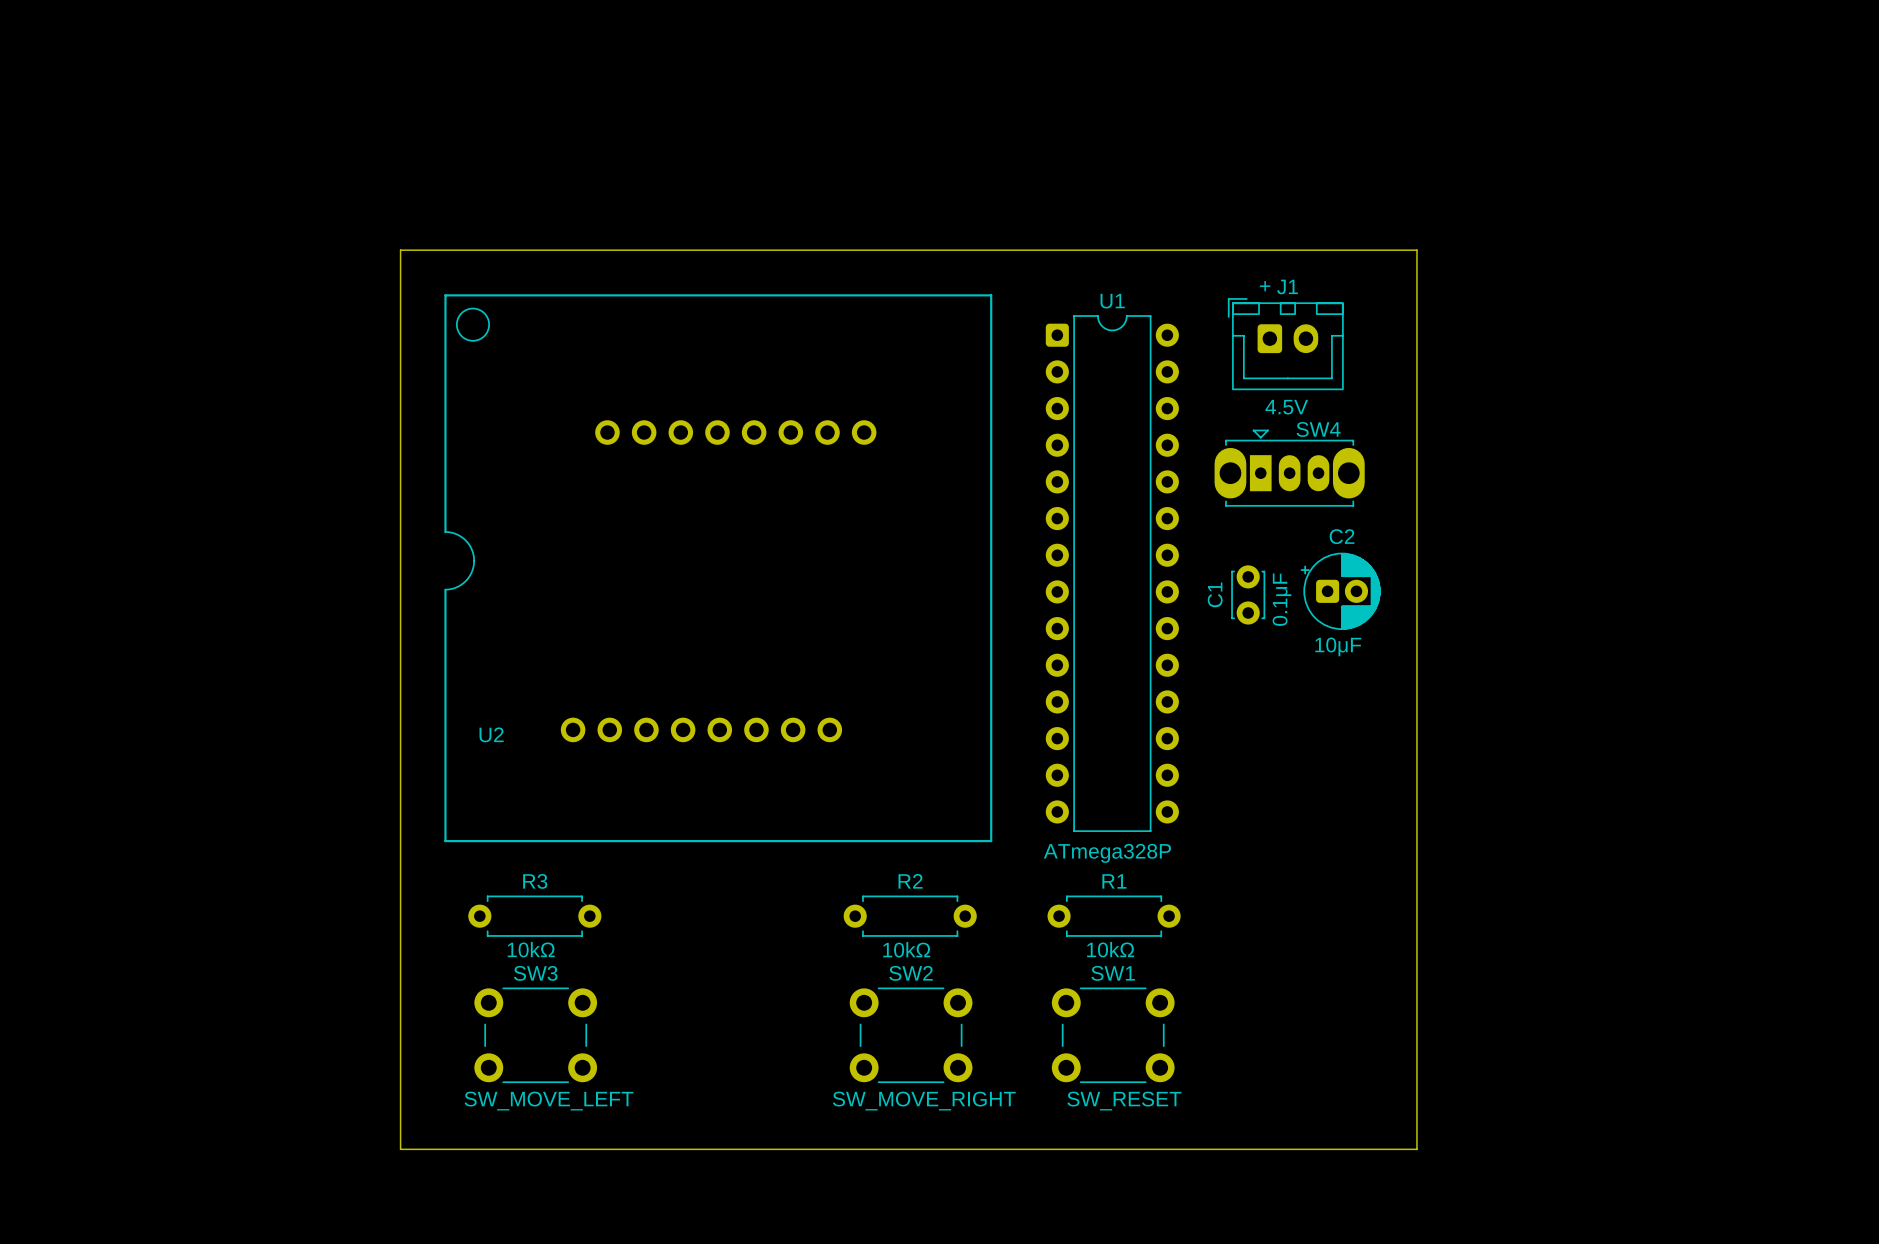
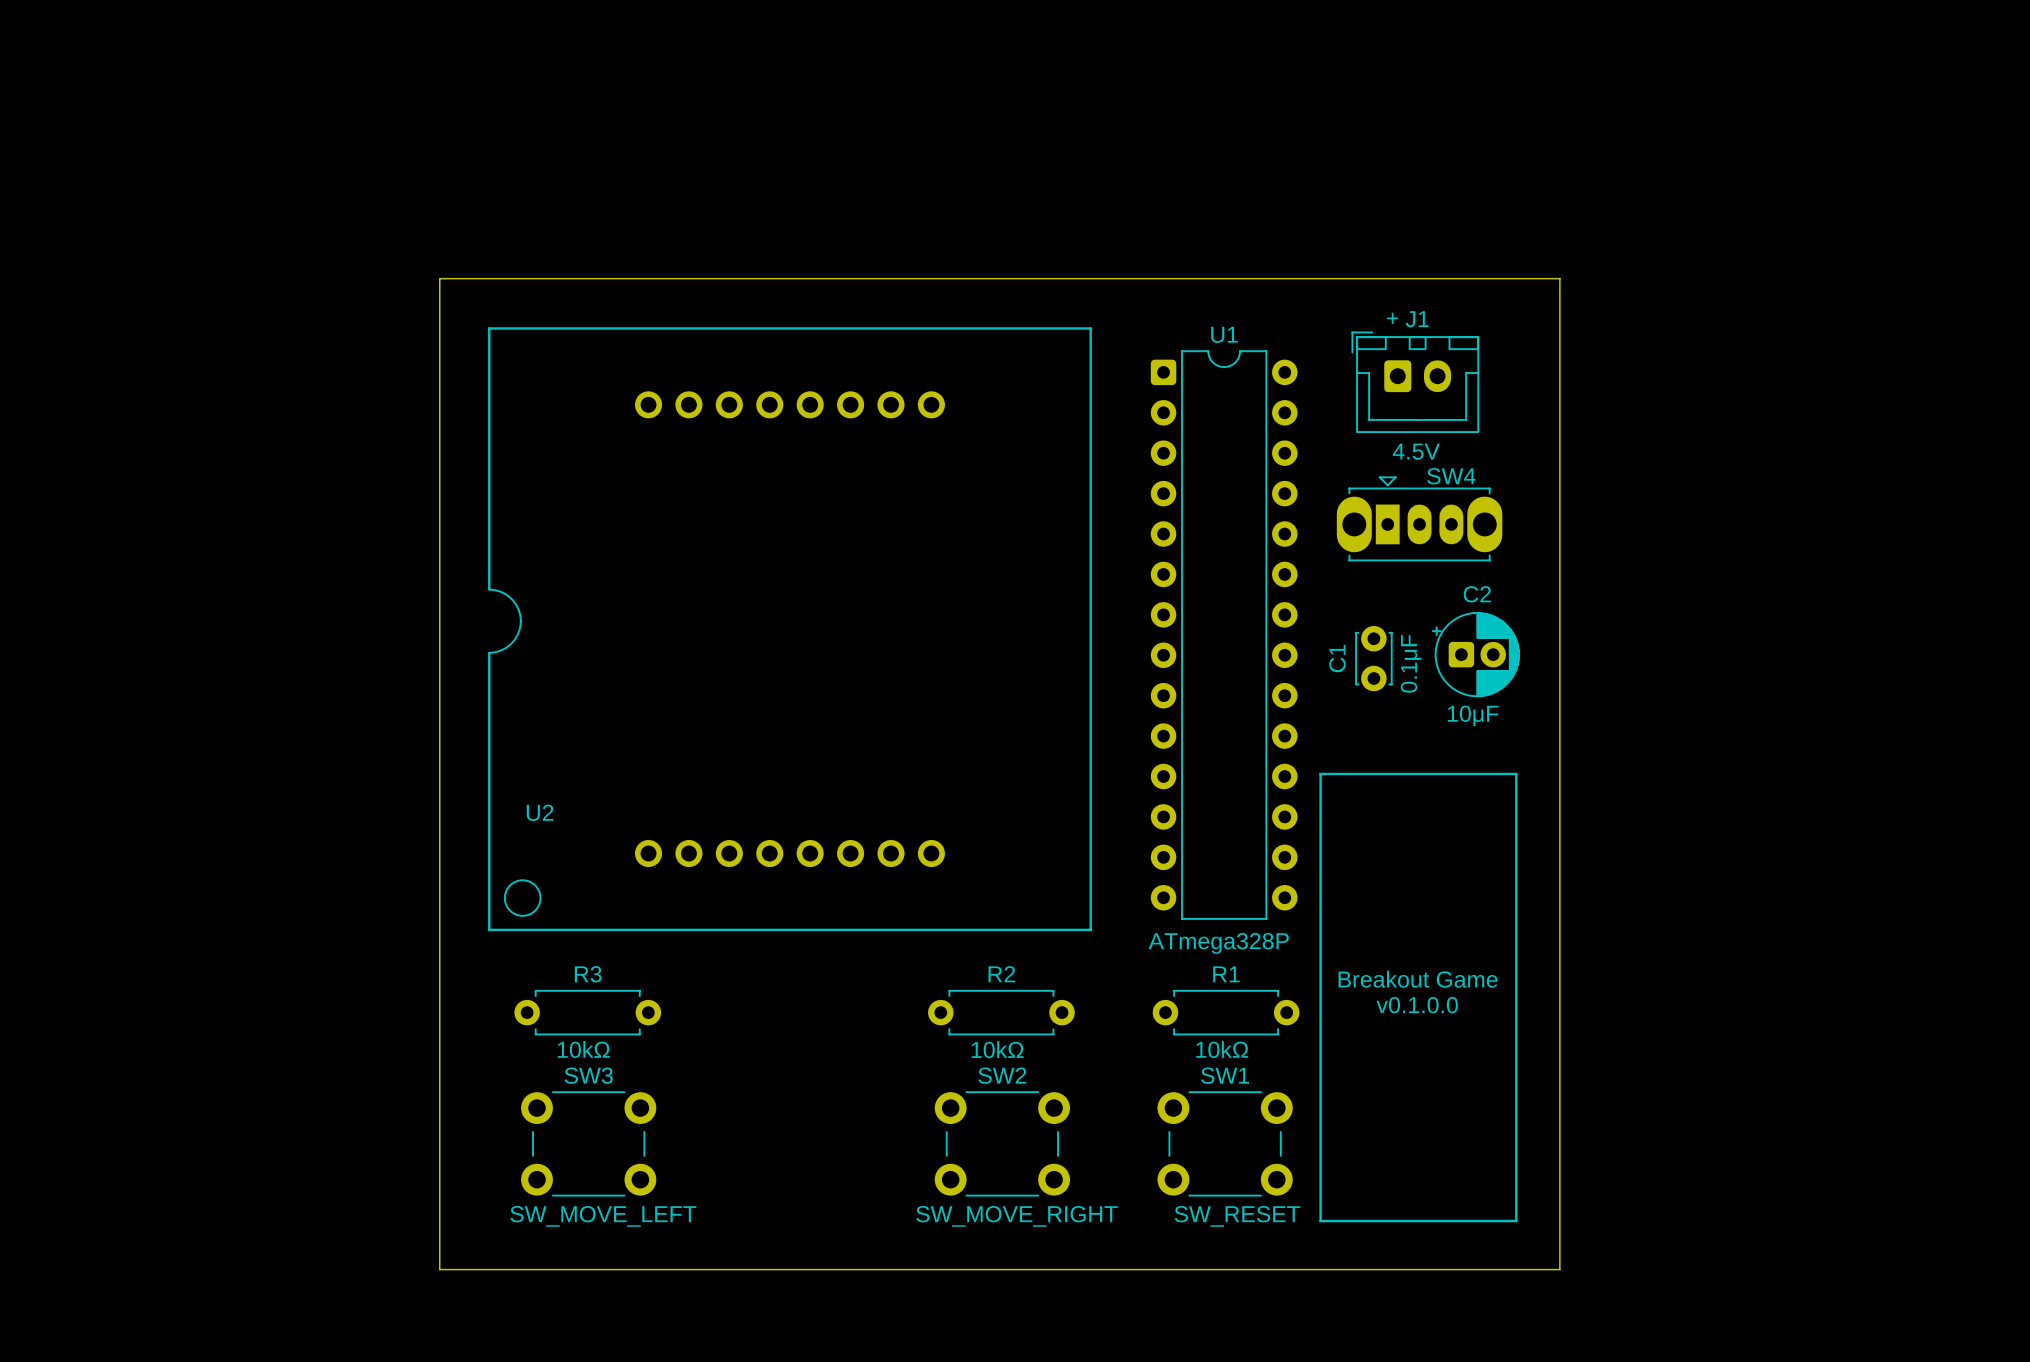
U2 footprint: [444, 294, 993, 843] -> [488, 327, 1092, 932]
line: none -> (1320, 773) (1516, 773) (1516, 1221) (1320, 1221) (1320, 773)
text: none -> Breakout Game (1418, 979)
text: none -> v0.1.0.0 (1417, 1005)

